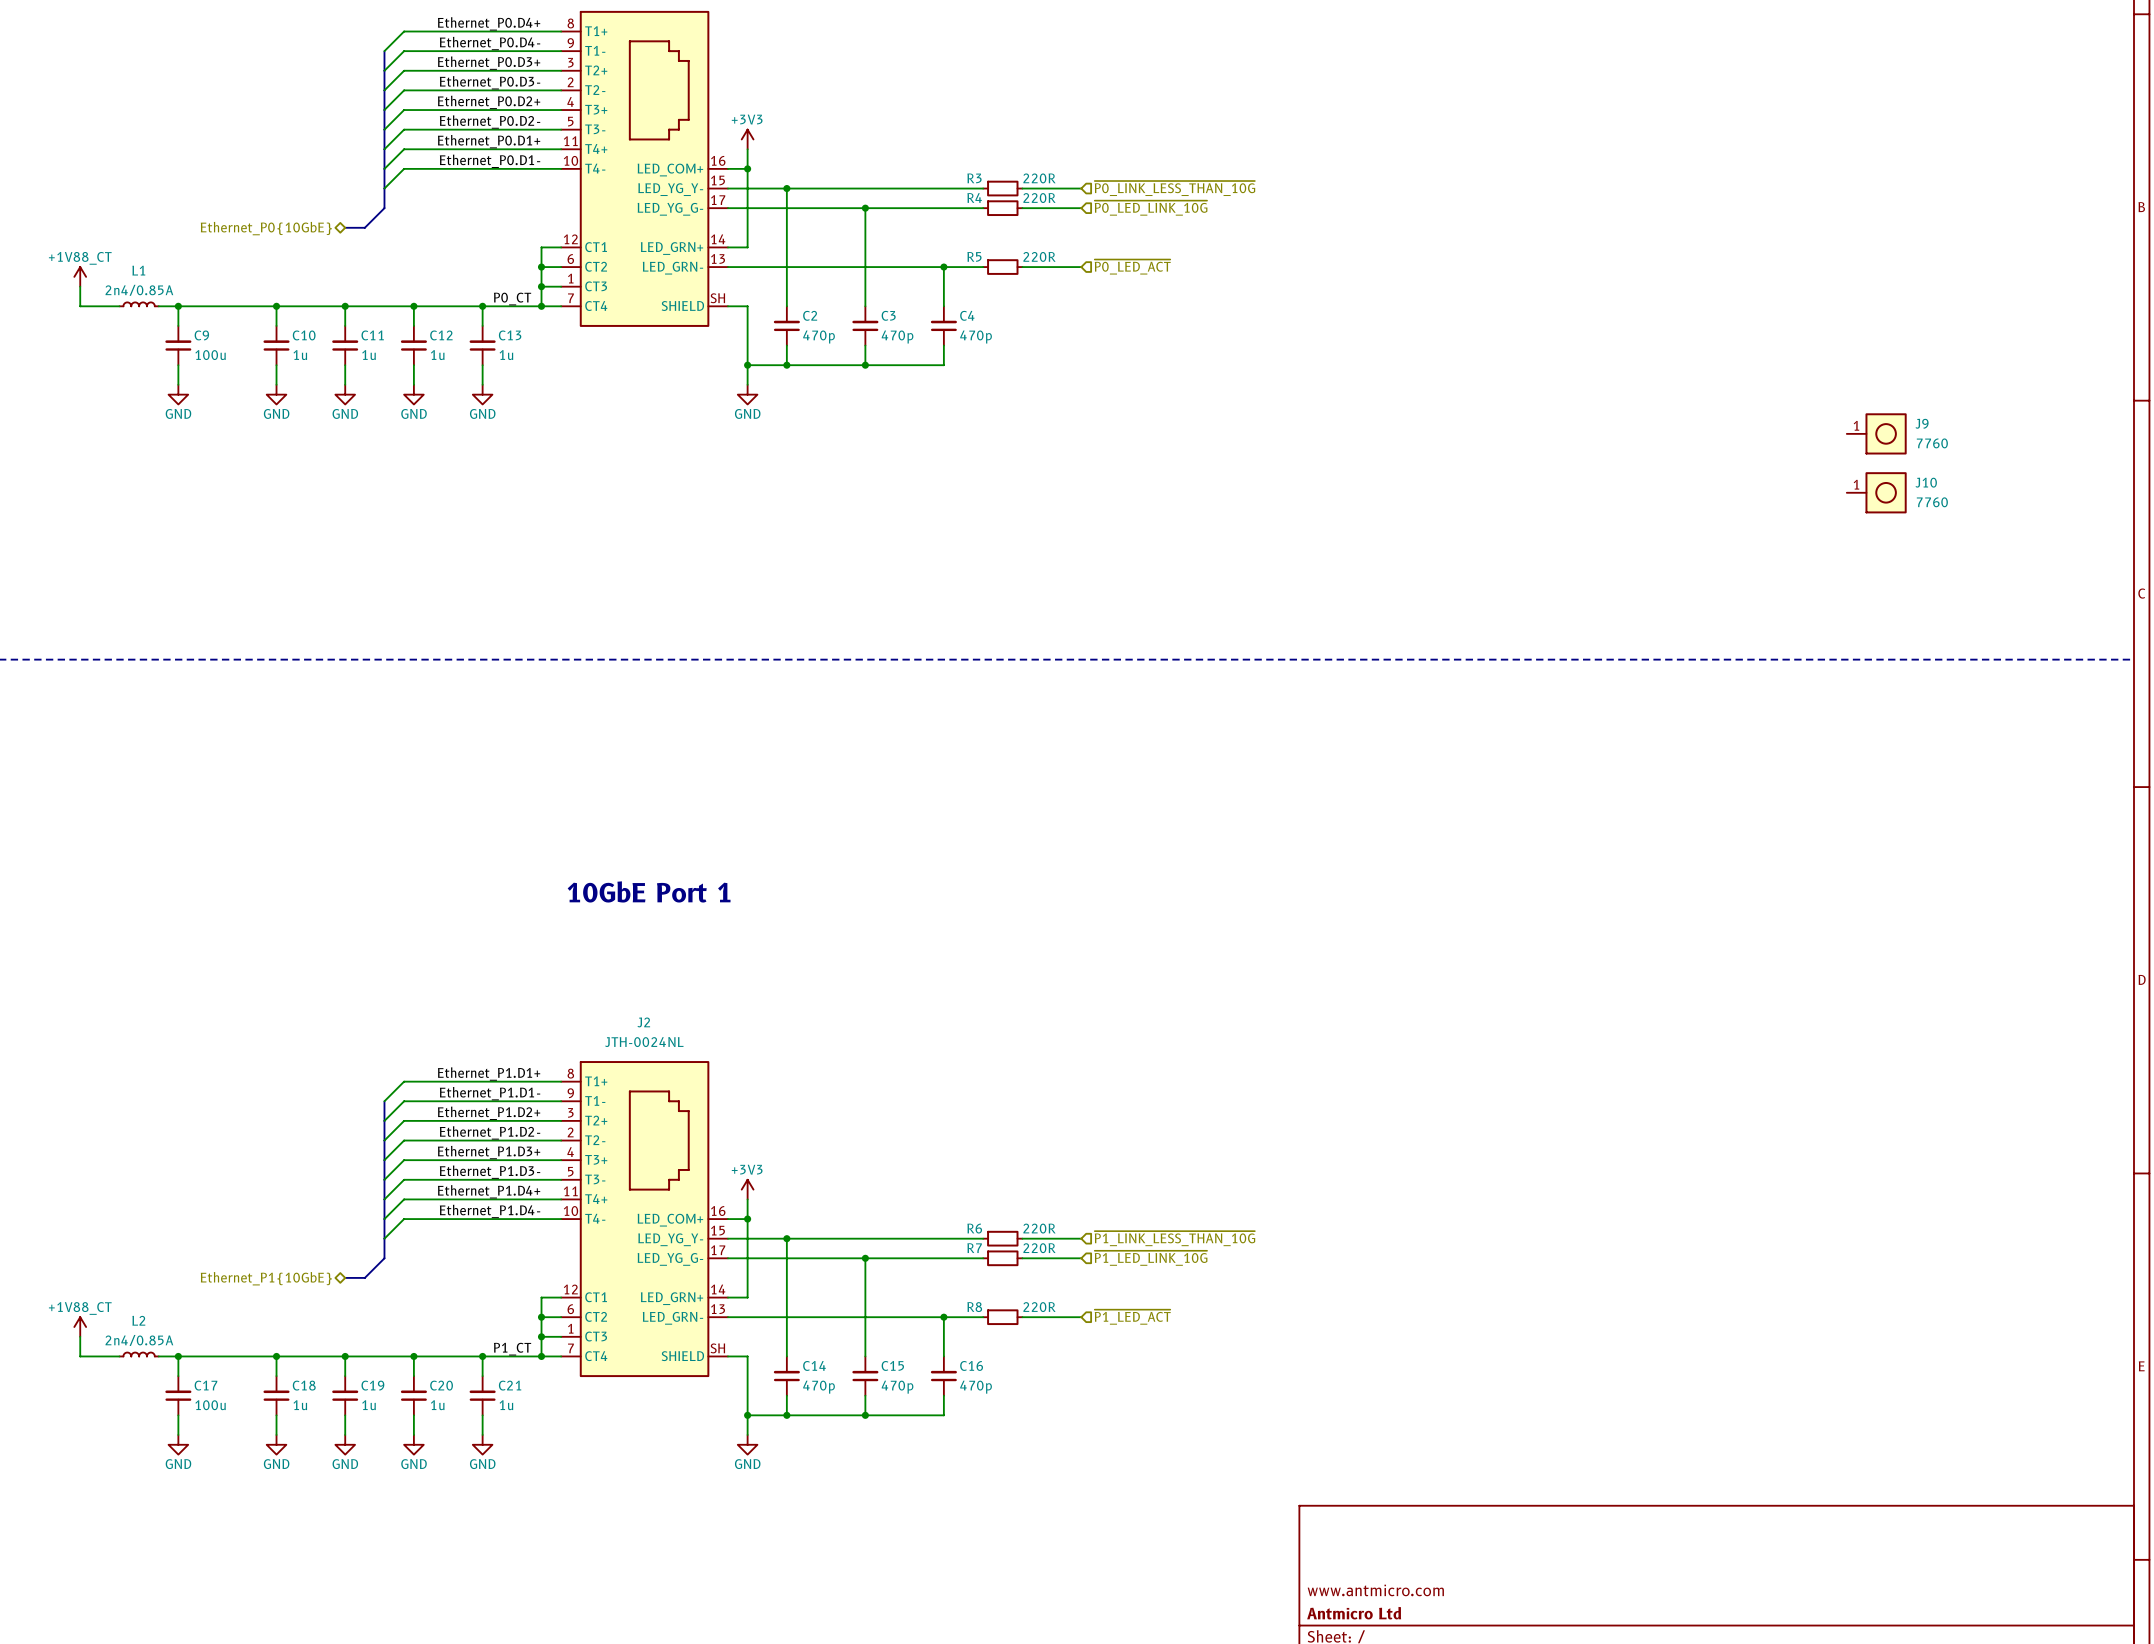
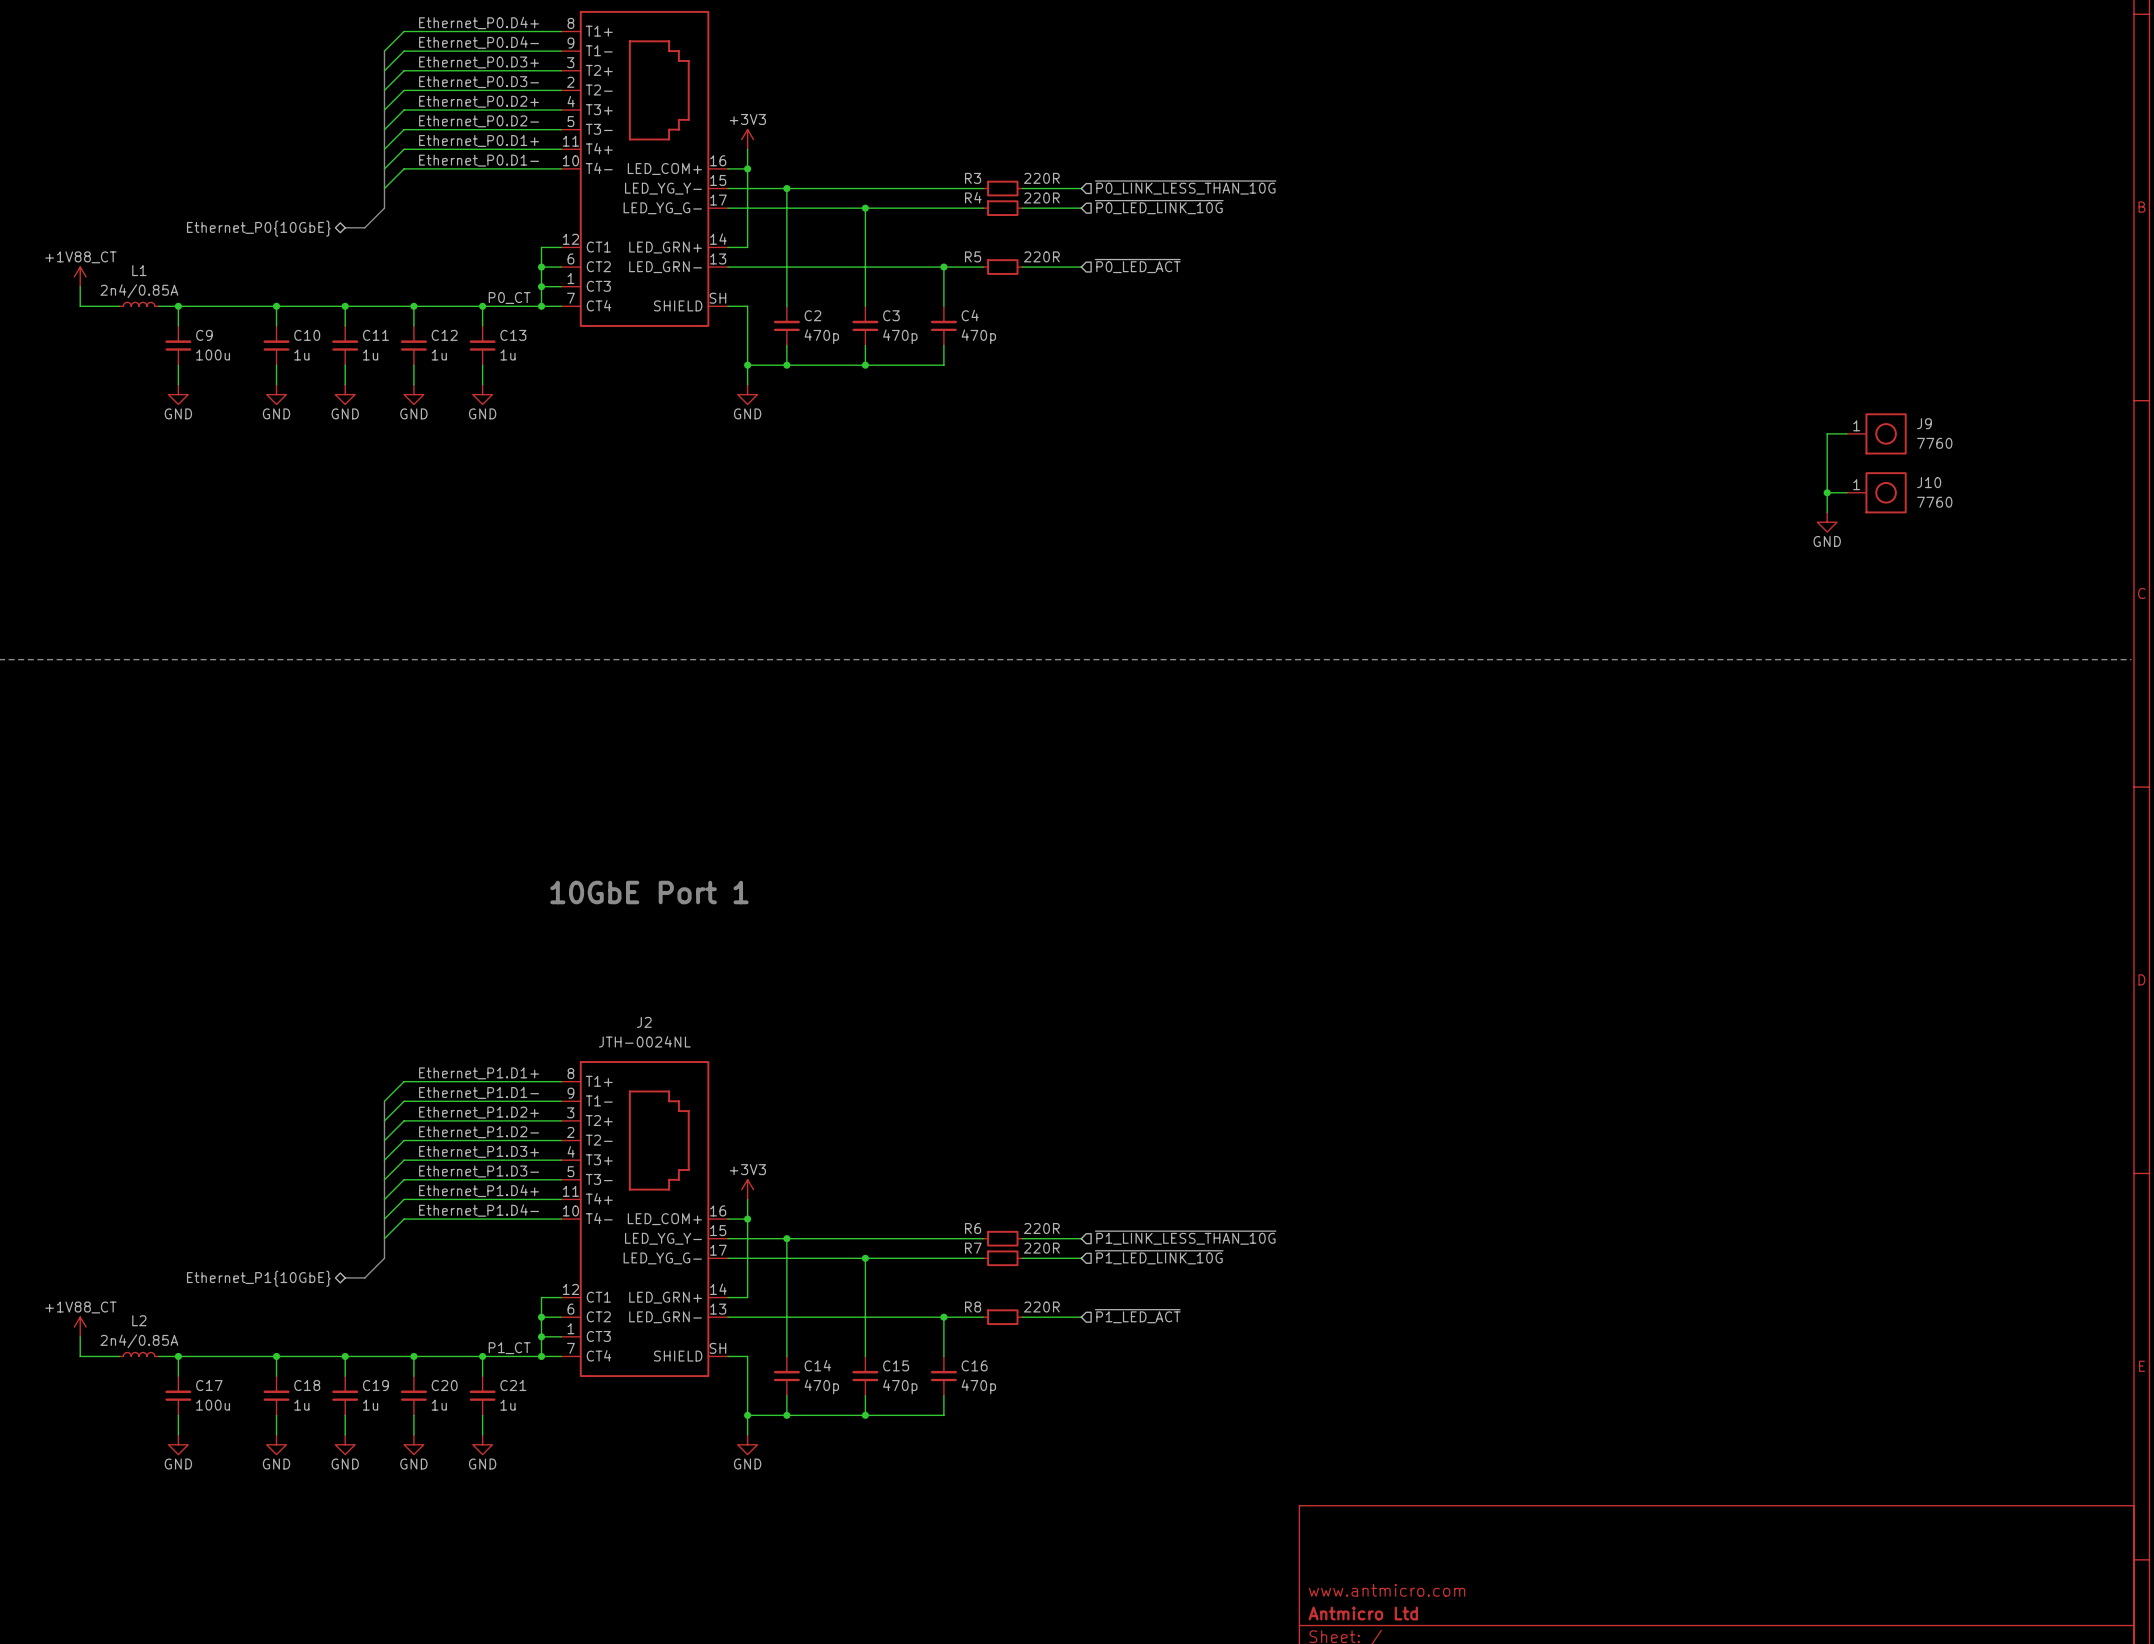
wire: none -> (1846, 433) (1827, 433) (1827, 512)
wire: none -> (1827, 492) (1846, 492)
junction: none -> (1827, 492)
power symbol: none -> GND (1827, 522)

